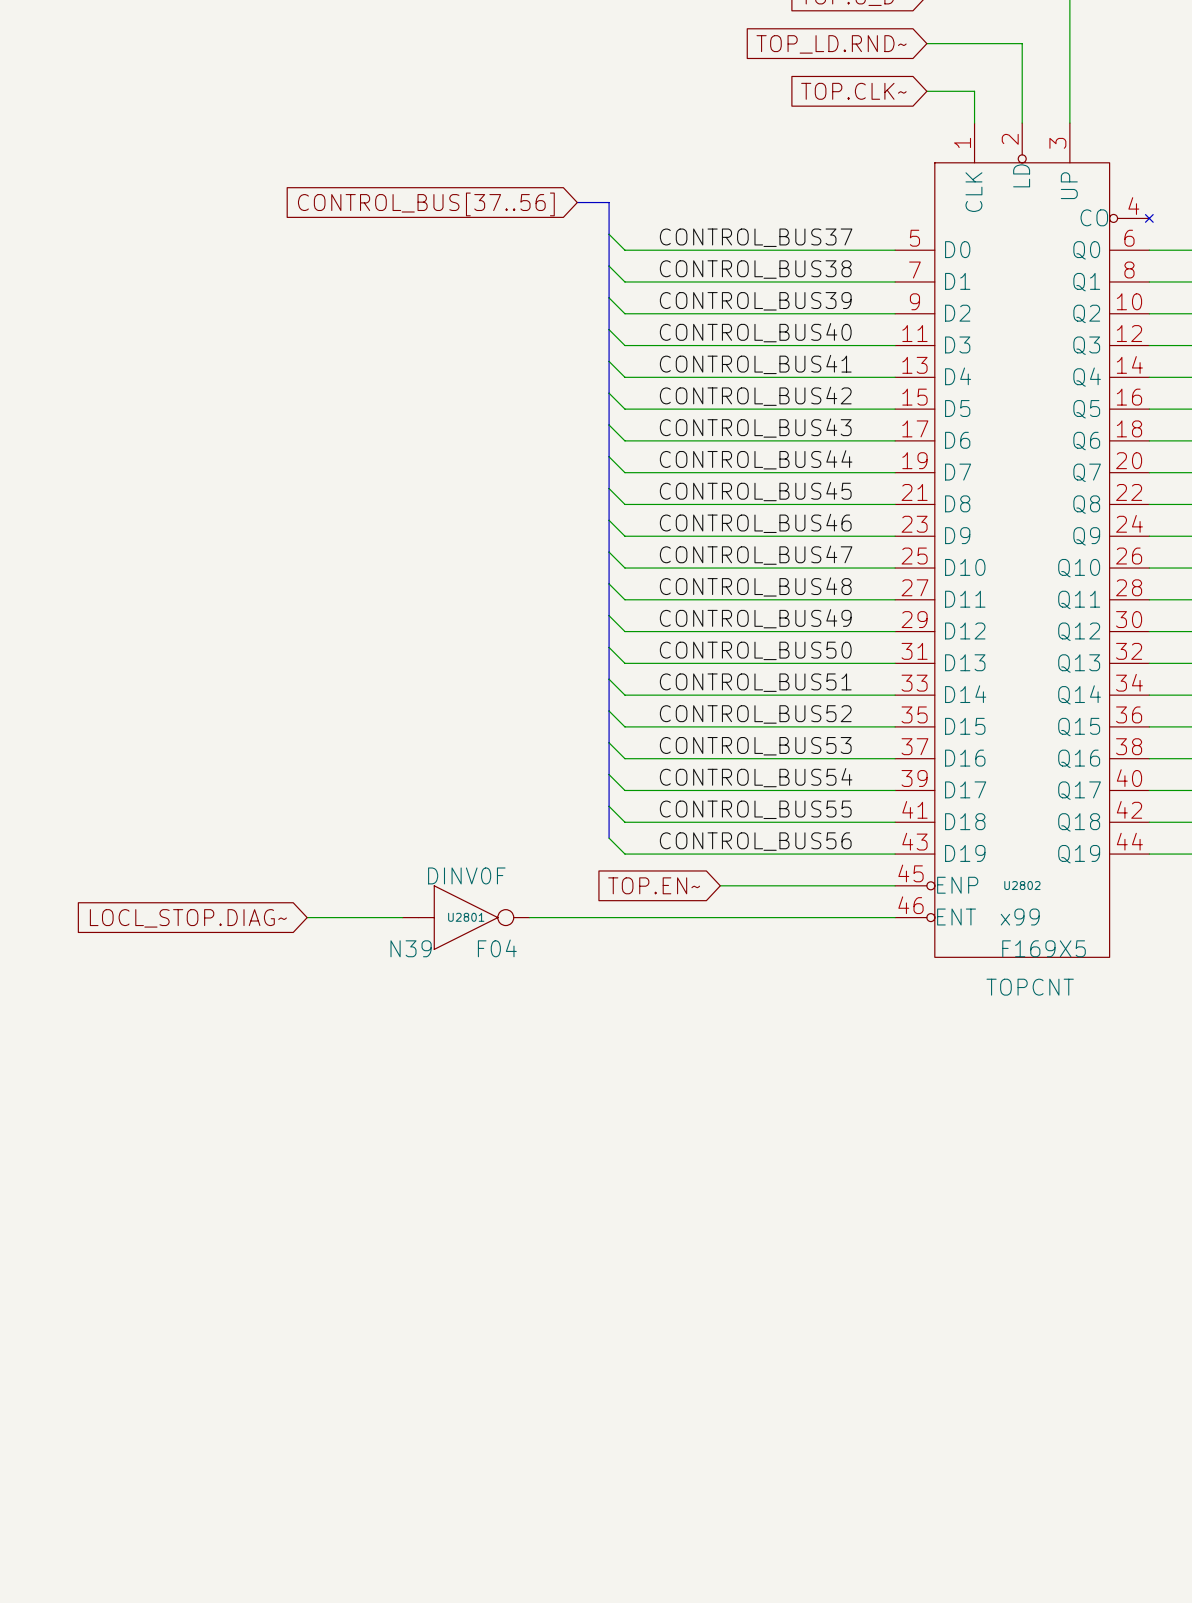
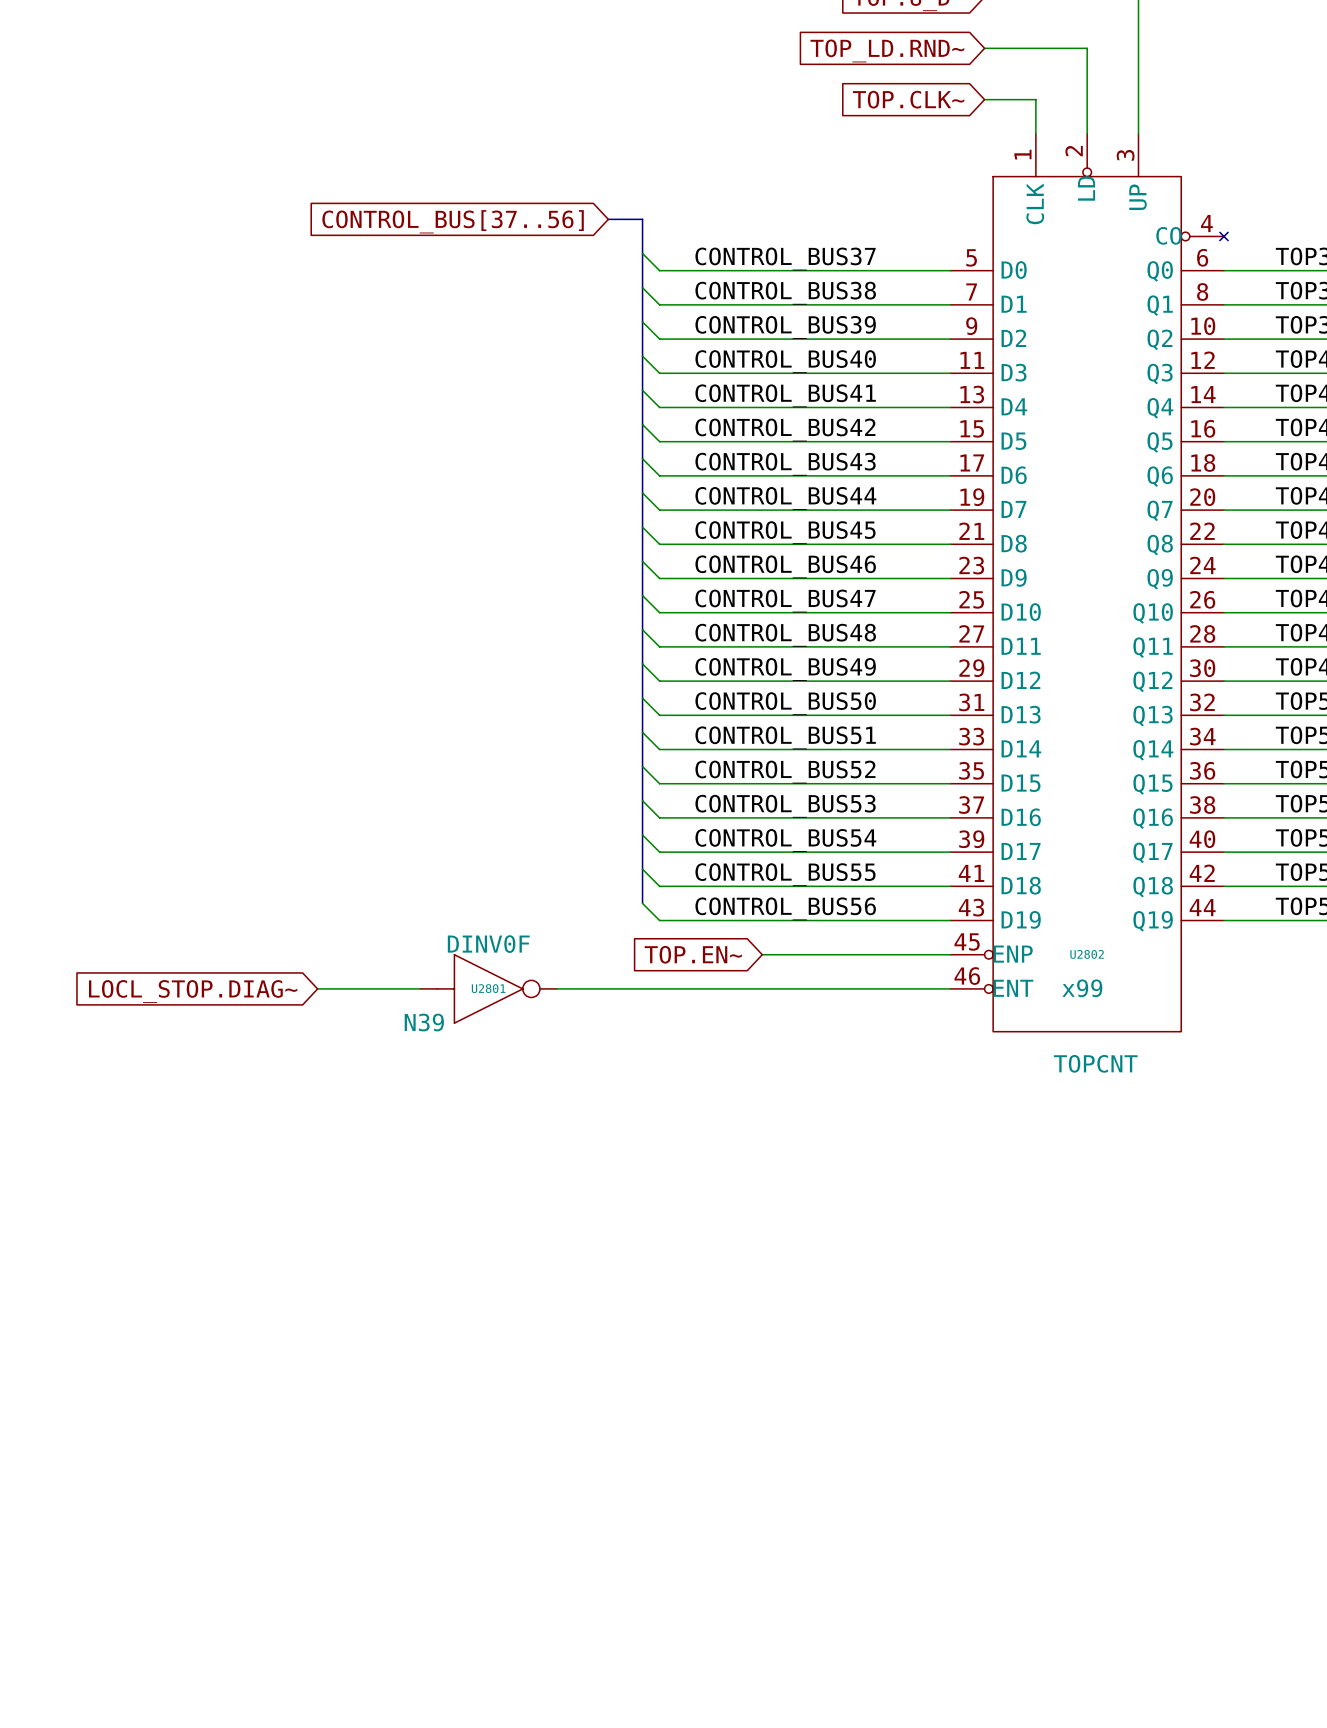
U2801 value: F04 (497, 948) -> none
U2802 value: F169X5 (1044, 948) -> none

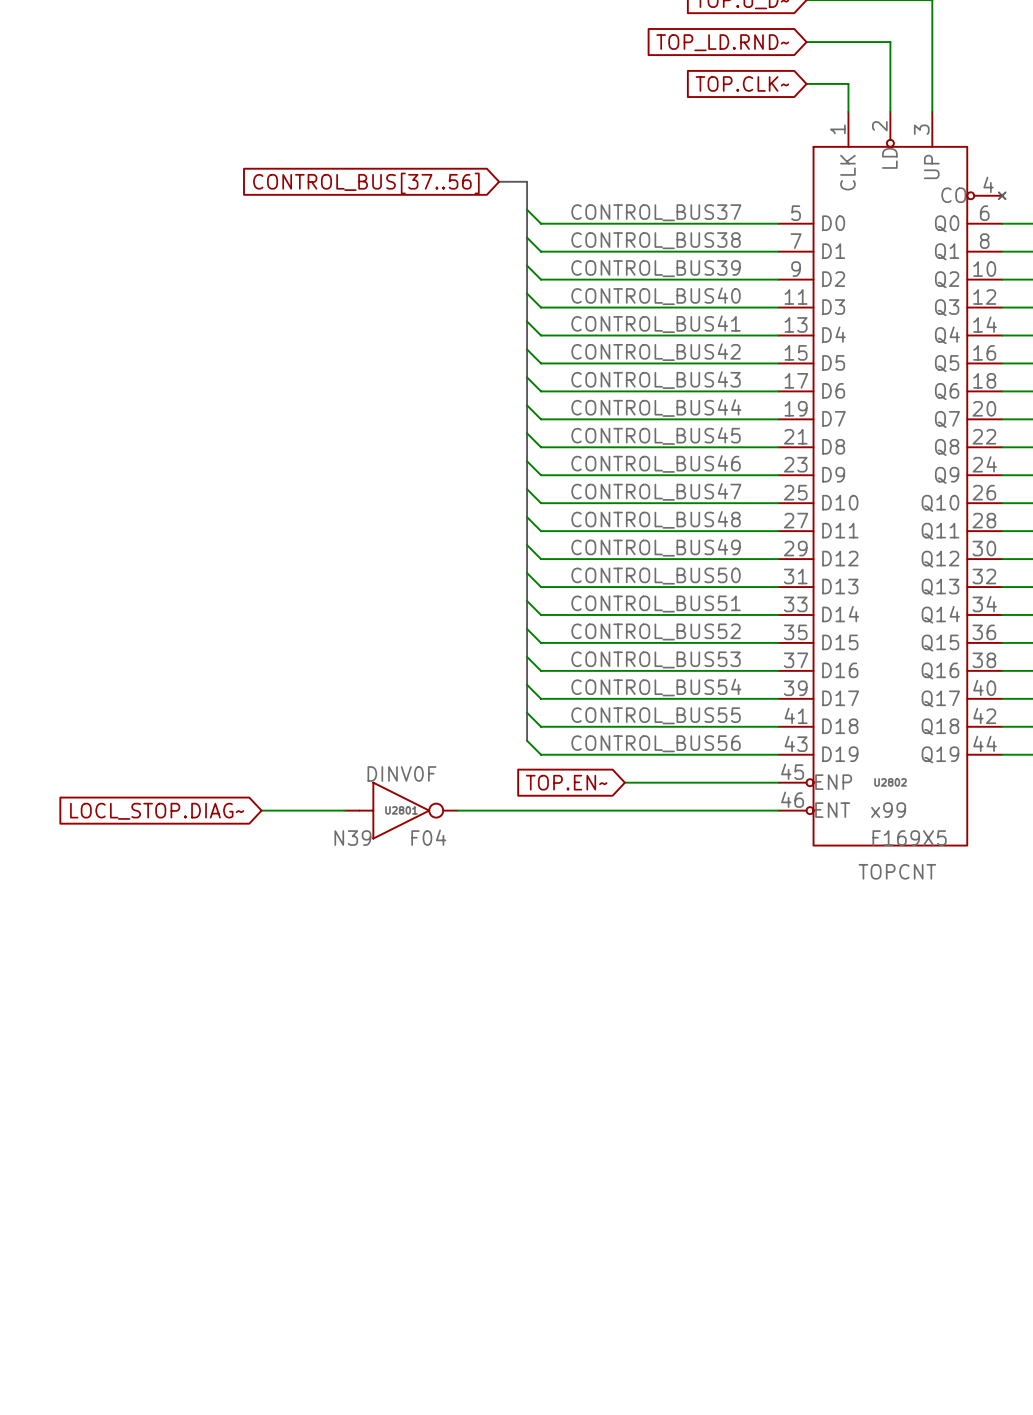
U2801 value: none -> F04 (428, 837)
U2802 value: none -> F169X5 (909, 838)

